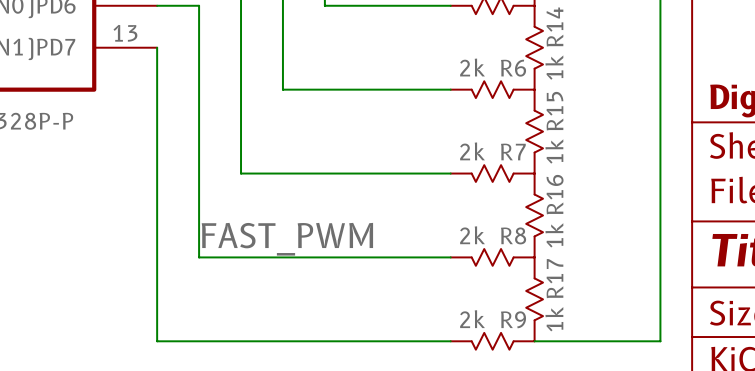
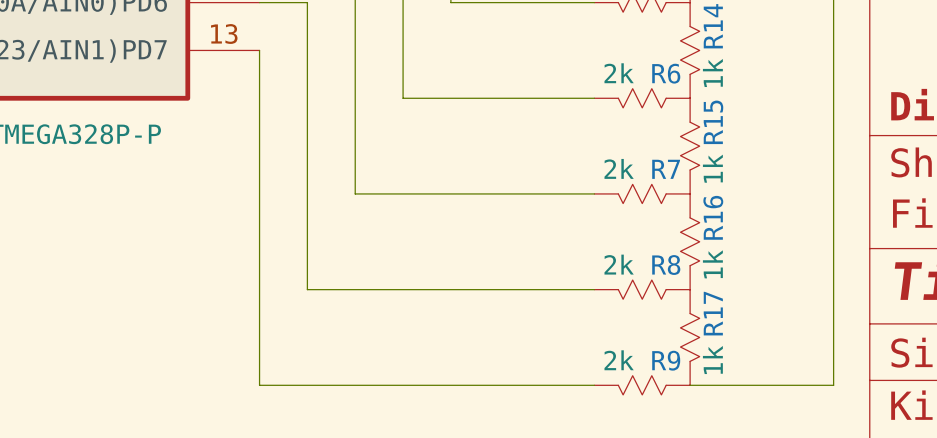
label: FAST_PWM (287, 239) -> none

